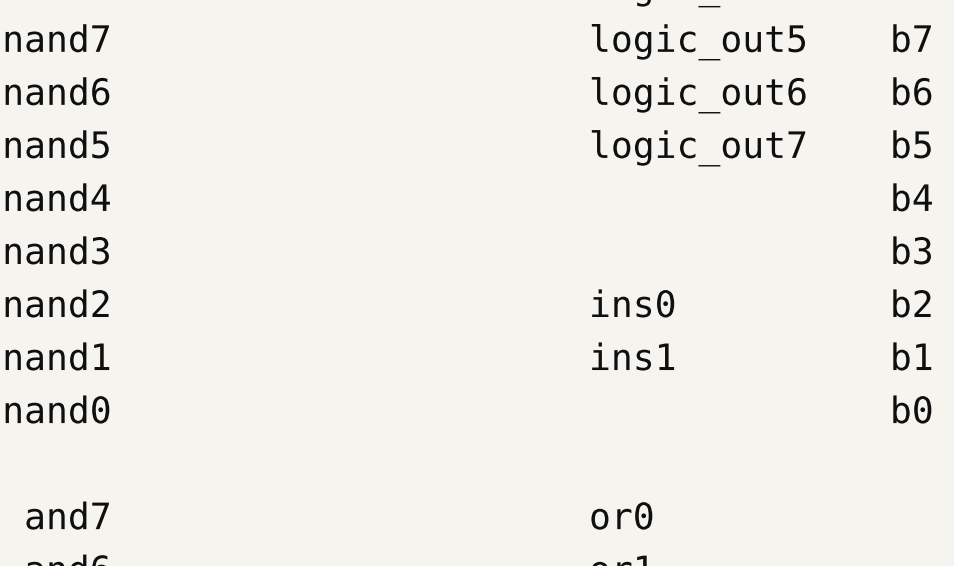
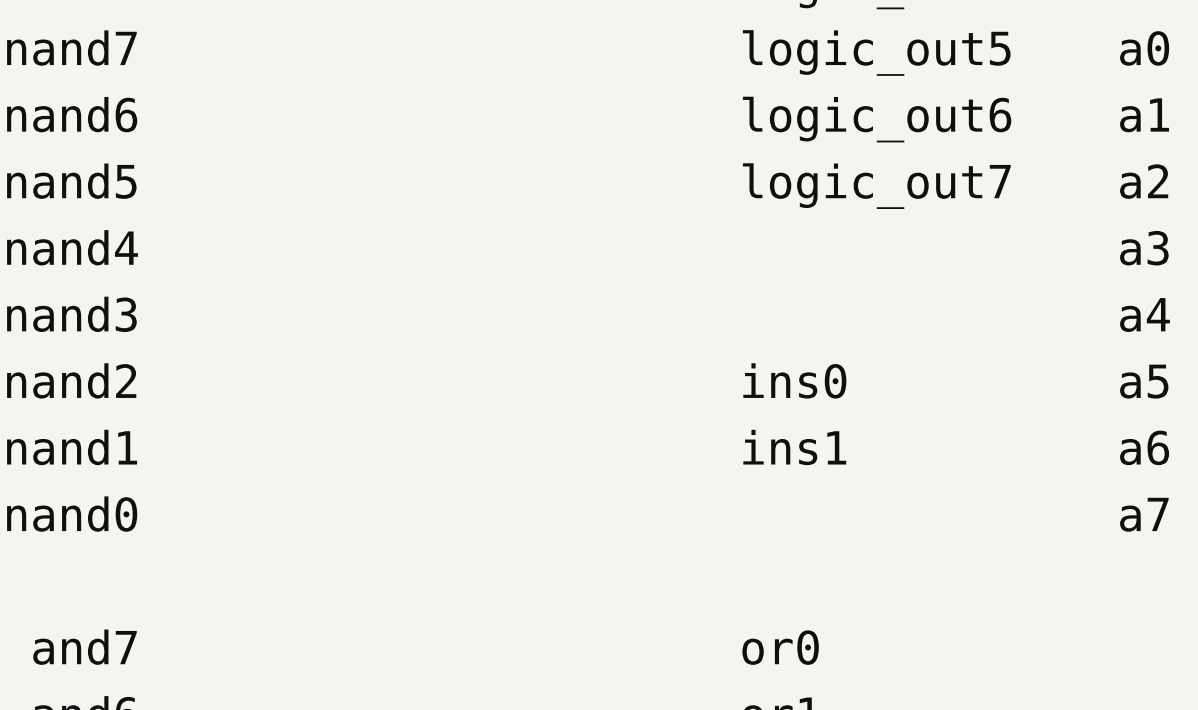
label: b7 (912, 38) -> a0 (1144, 48)
label: b6 (912, 91) -> a1 (1144, 115)
label: b5 (912, 144) -> a2 (1144, 181)
label: b4 (912, 197) -> a3 (1144, 248)
label: b3 (912, 250) -> a4 (1144, 315)
label: b2 (911, 303) -> a5 (1144, 381)
label: b1 (912, 356) -> a6 (1144, 447)
label: b0 (912, 409) -> a7 (1144, 514)

